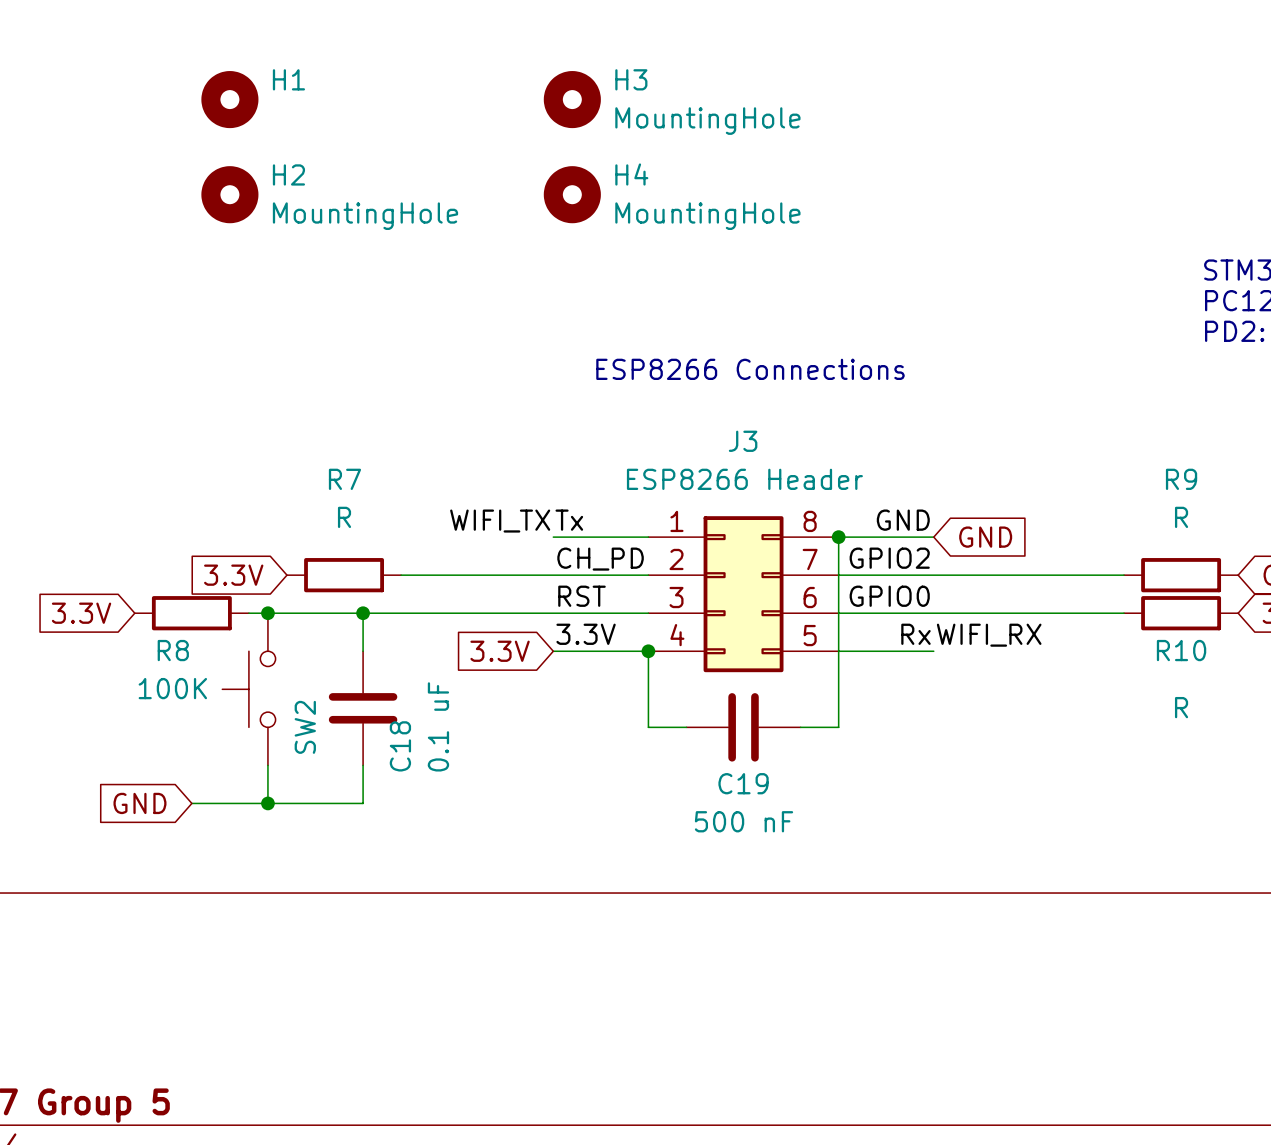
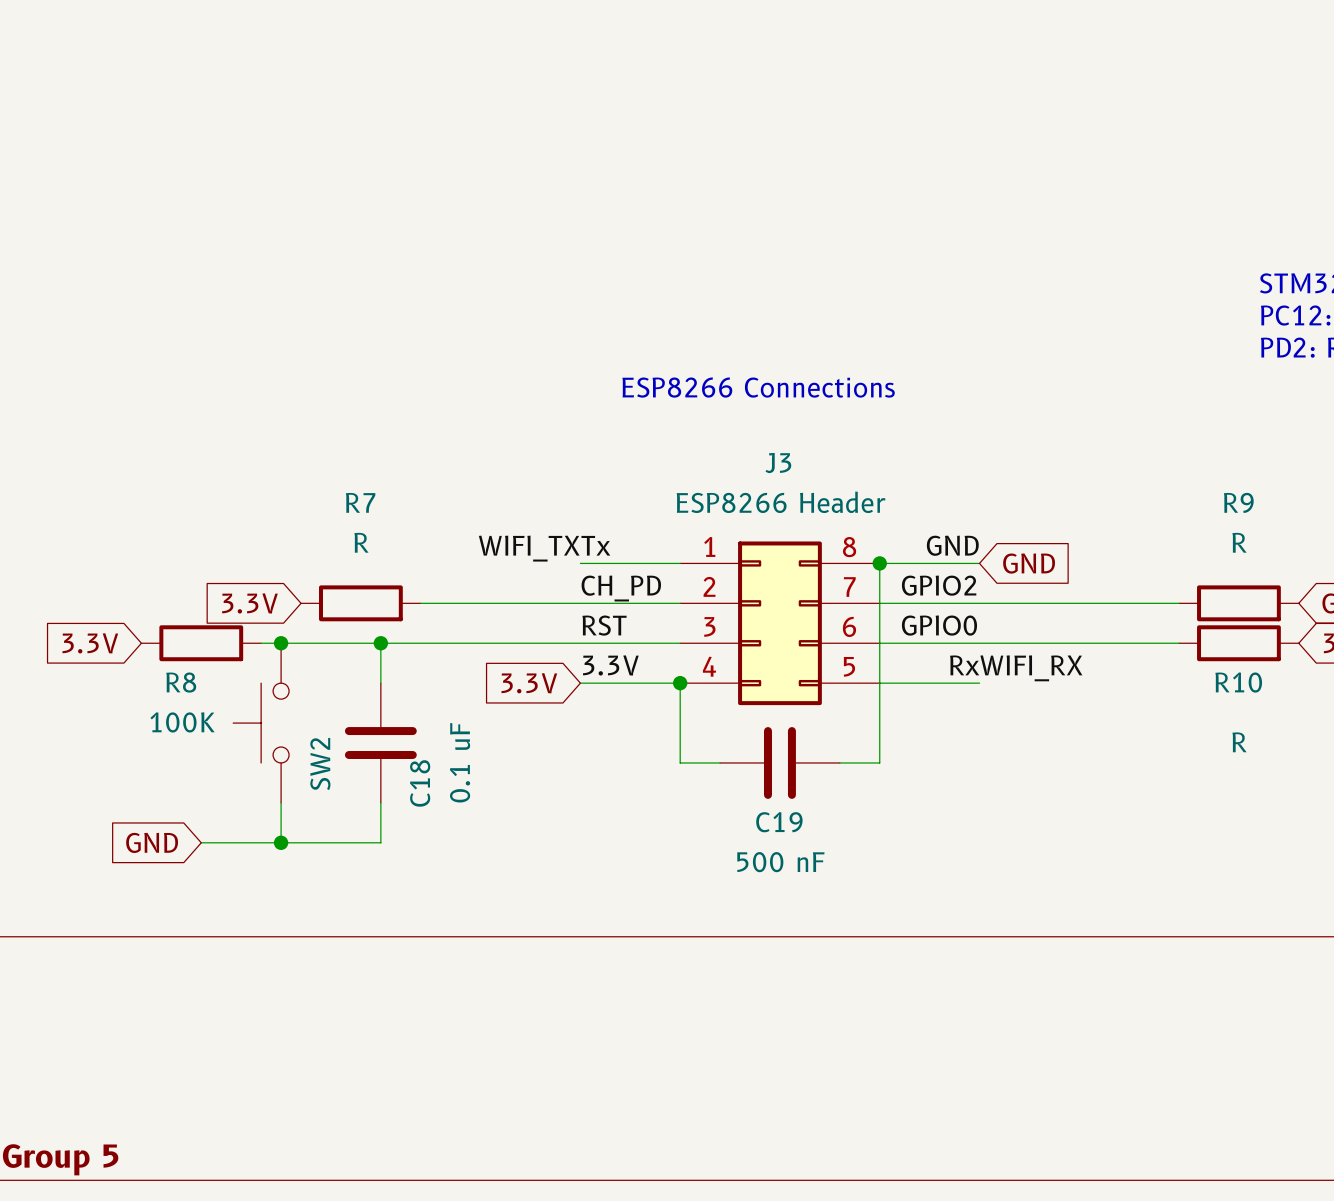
H1: (229, 99) -> none
H3: MountingHole (572, 99) -> none
H2: MountingHole (229, 194) -> none
H4: MountingHole (572, 194) -> none

